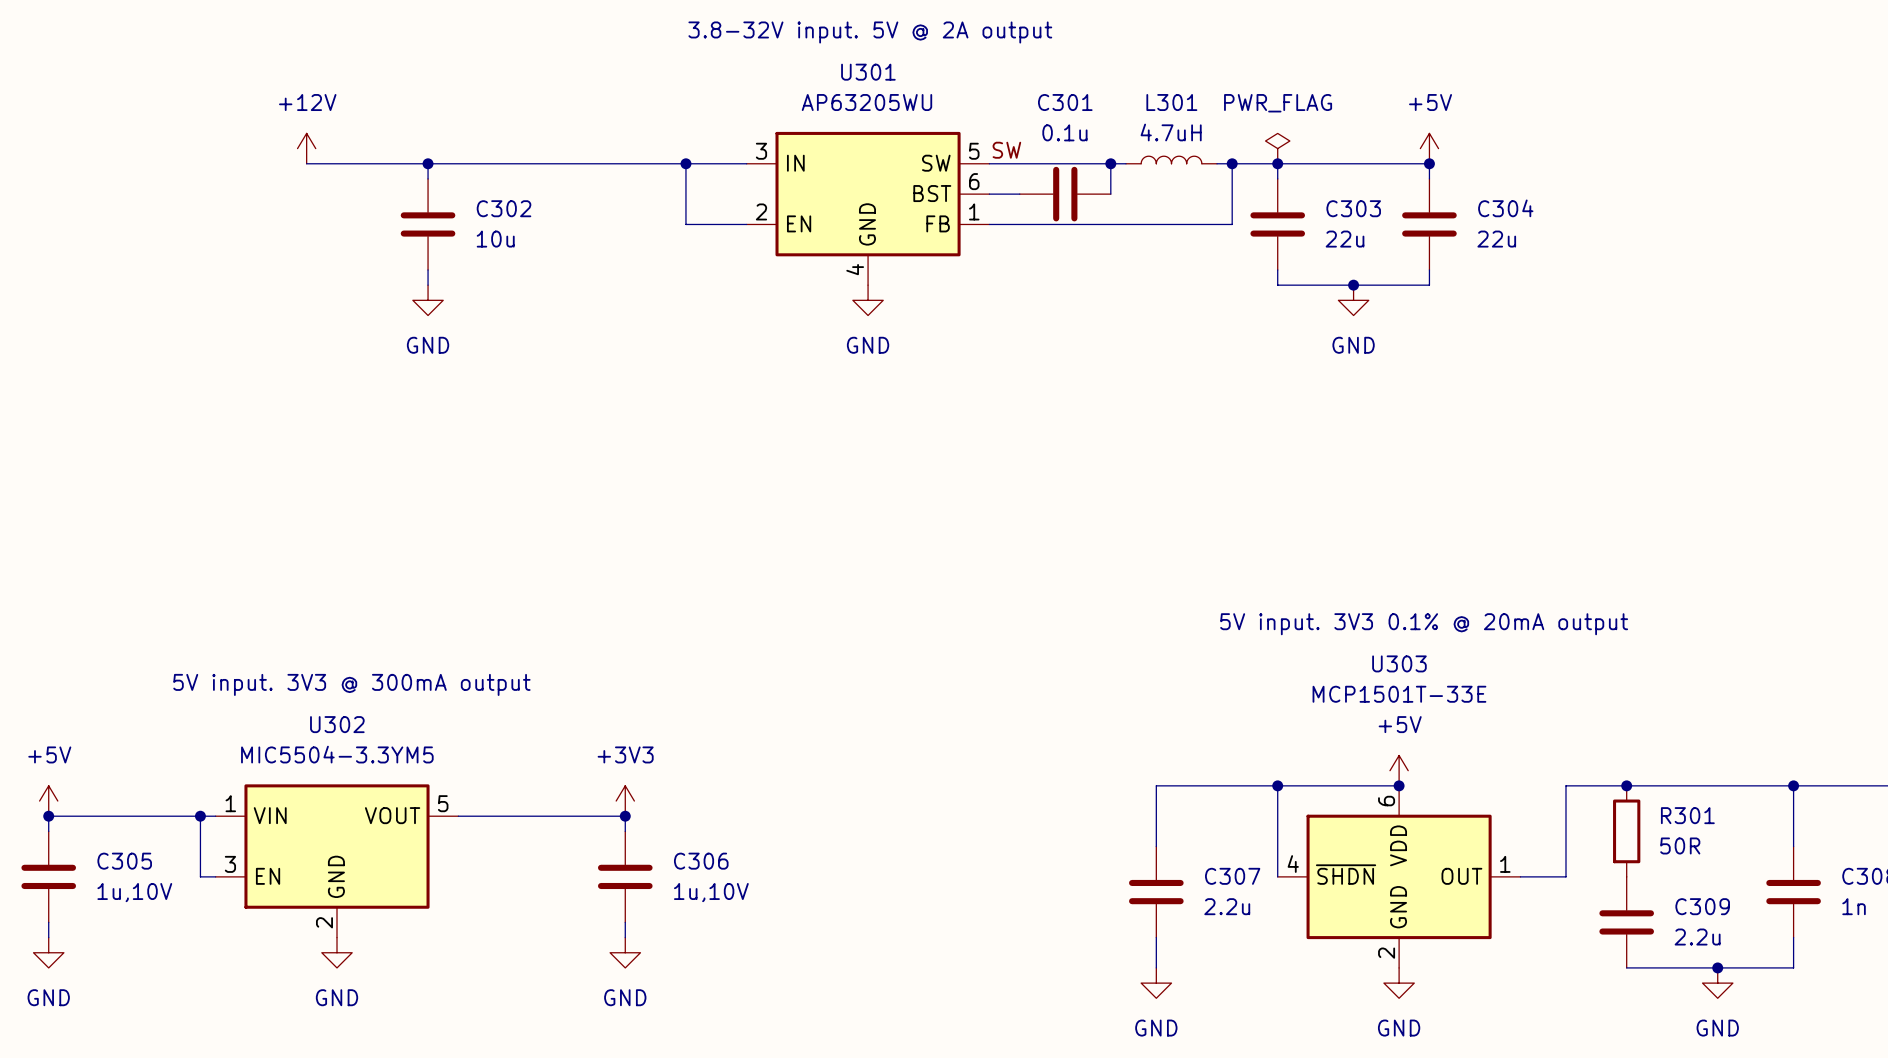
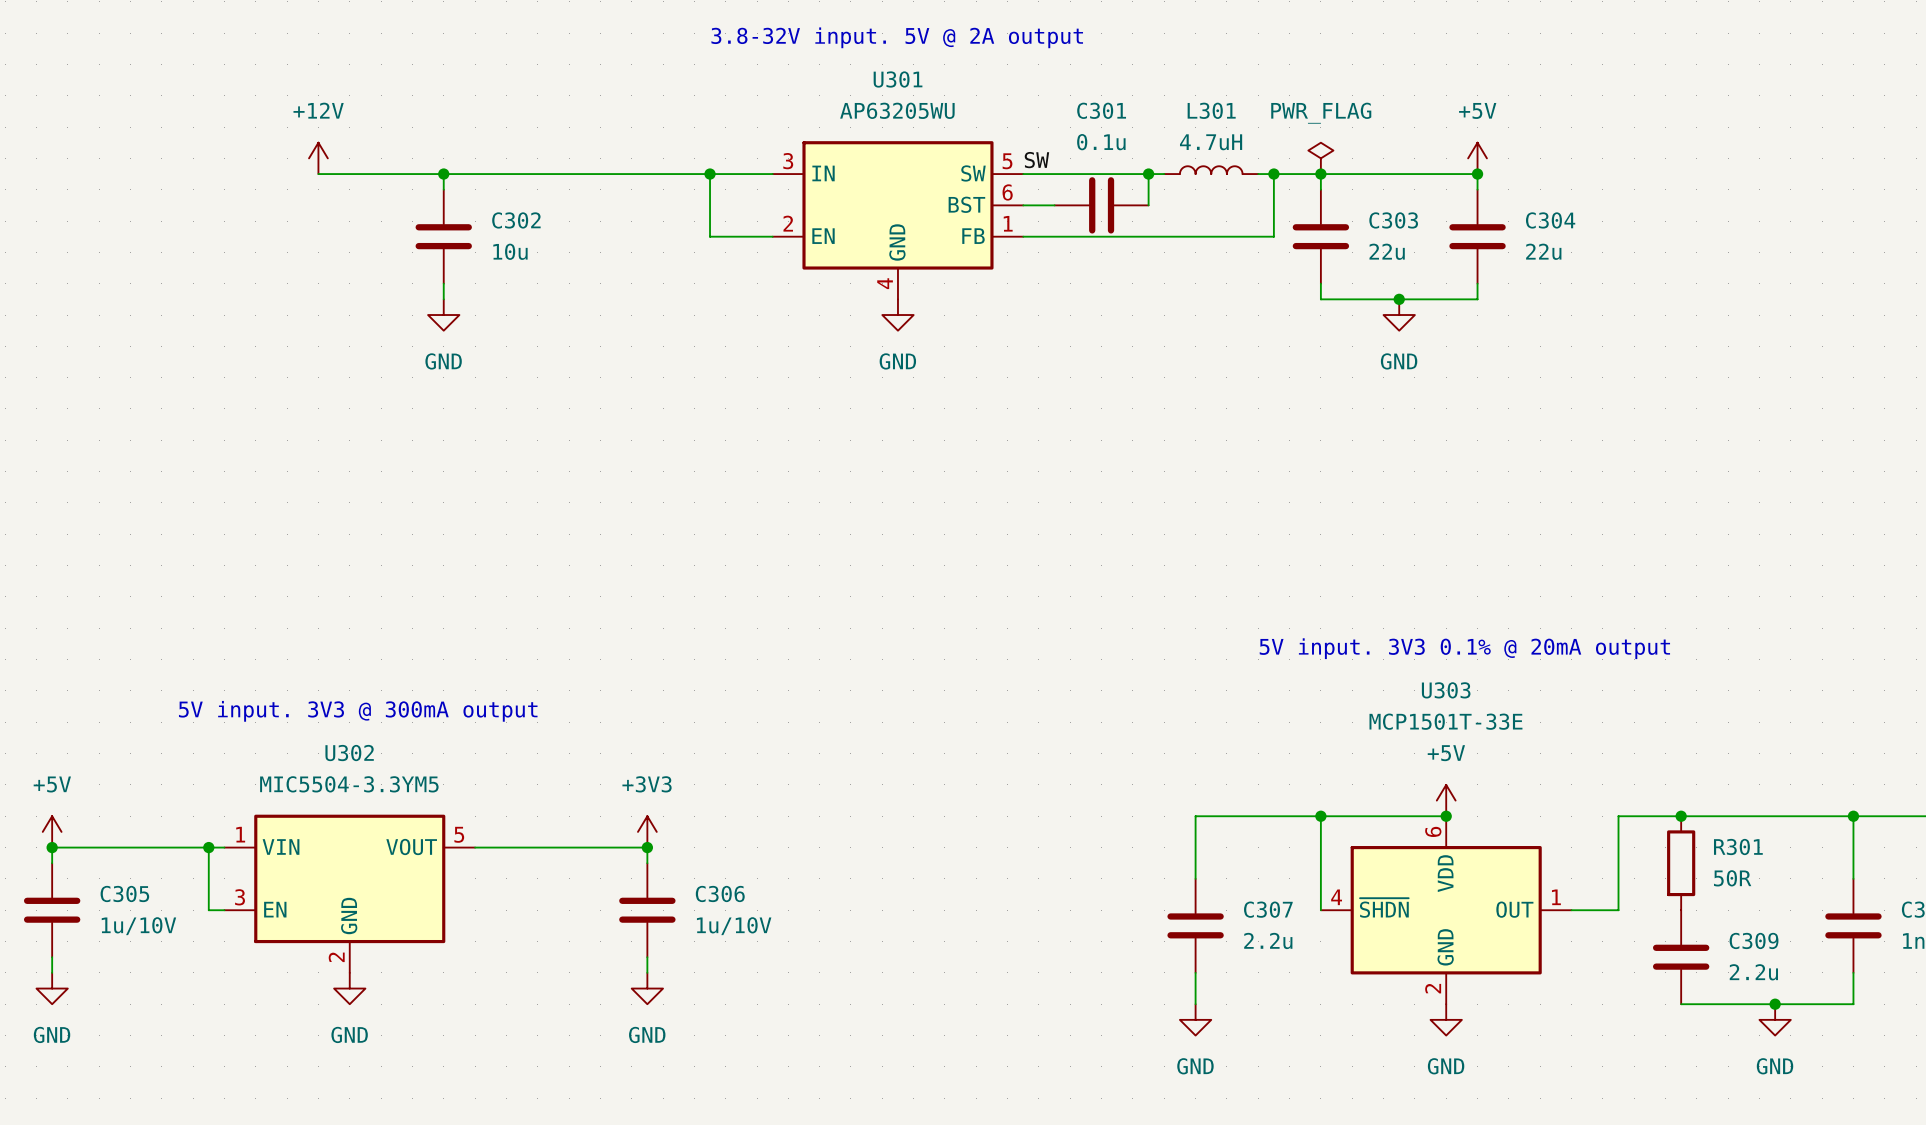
C305 value: 1u,10V (134, 892) -> 1u/10V (138, 926)
C306 value: 1u,10V (711, 892) -> 1u/10V (734, 926)

